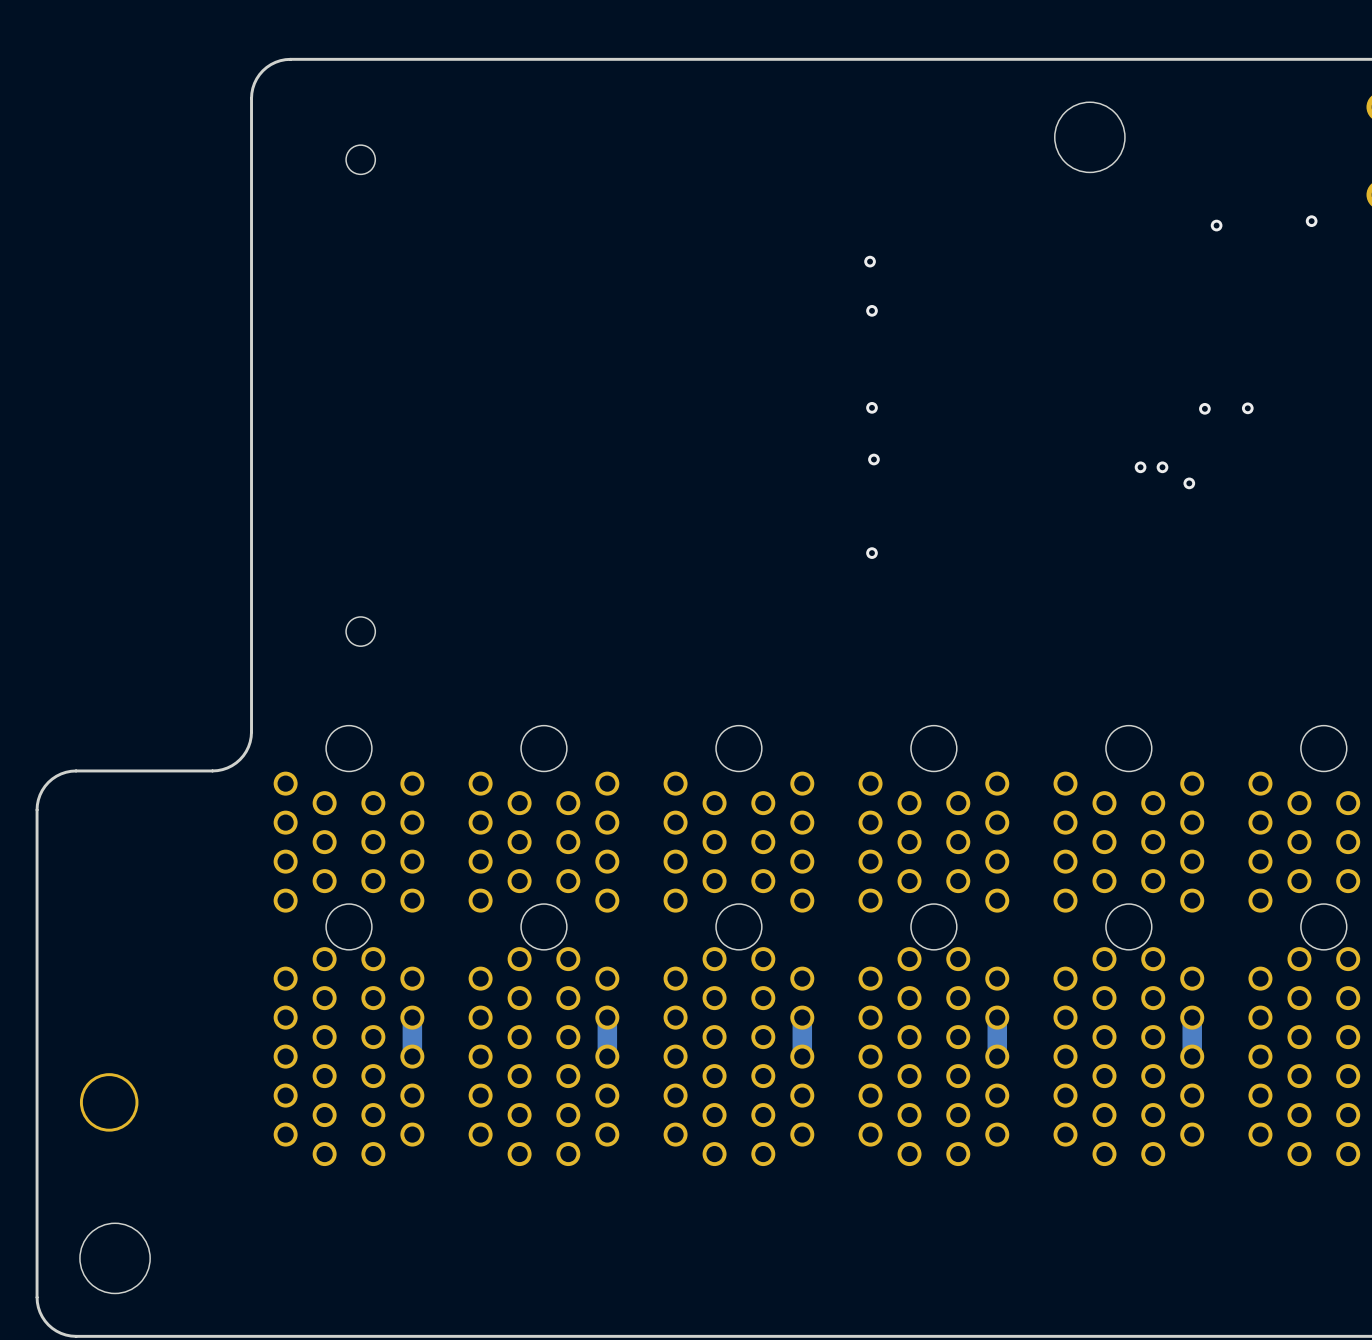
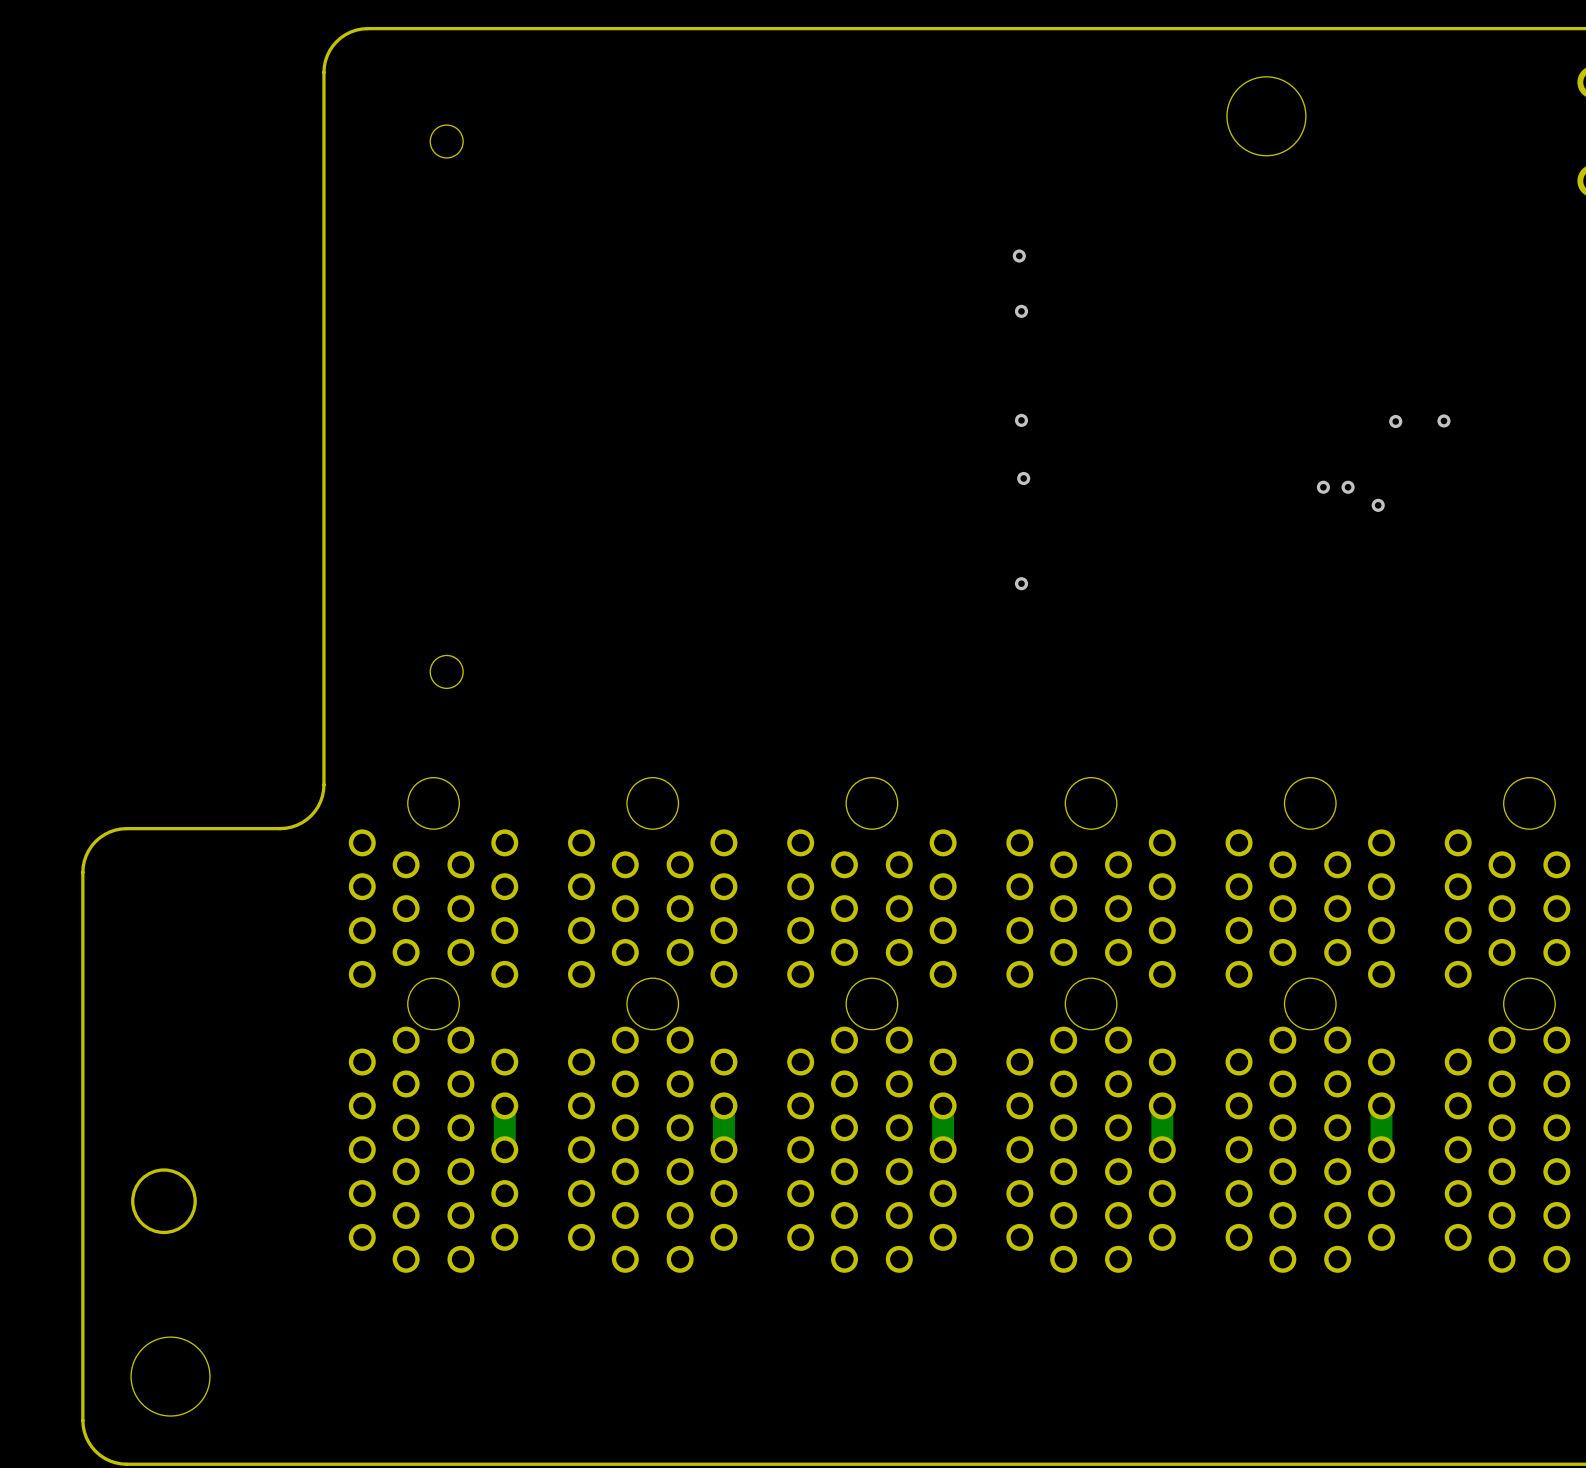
via: (1311, 221) -> none
via: (1216, 225) -> none

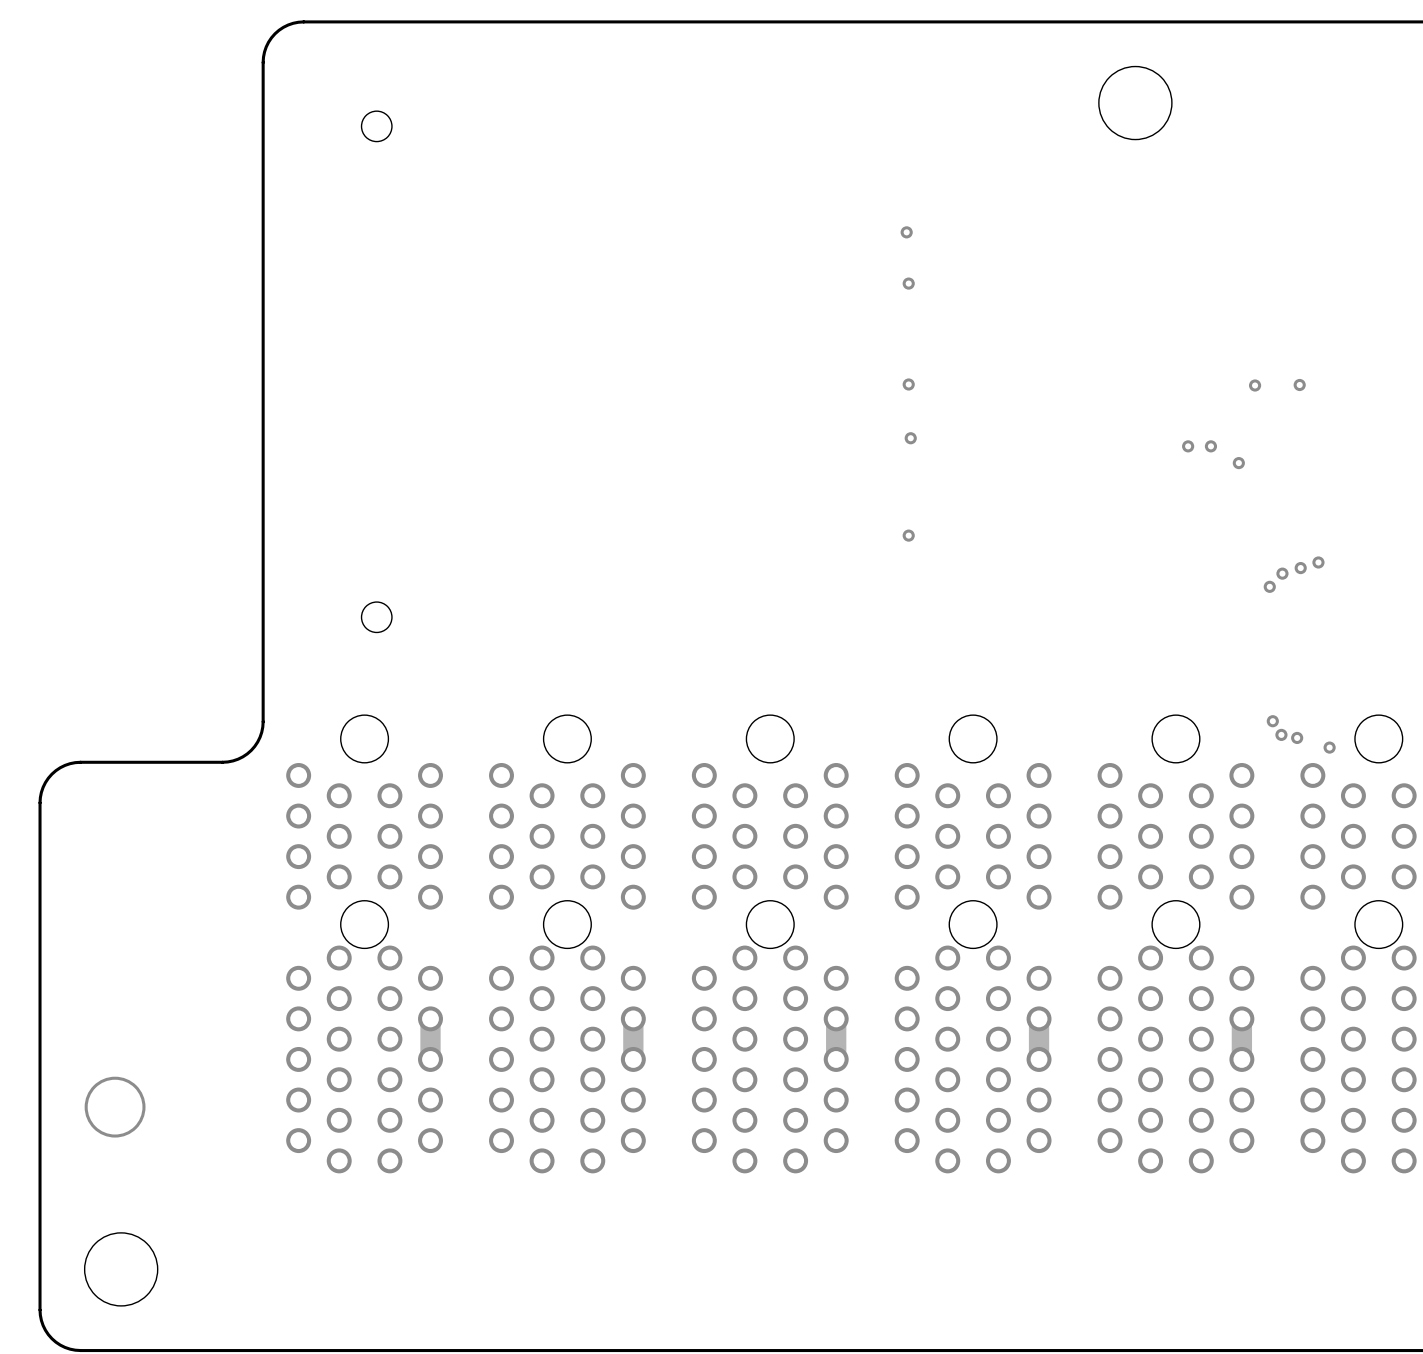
via: none -> (1318, 562)
via: none -> (1300, 568)
via: none -> (1282, 573)
via: none -> (1269, 586)
via: none -> (1272, 721)
via: none -> (1281, 734)
via: none -> (1297, 737)
via: none -> (1329, 747)

